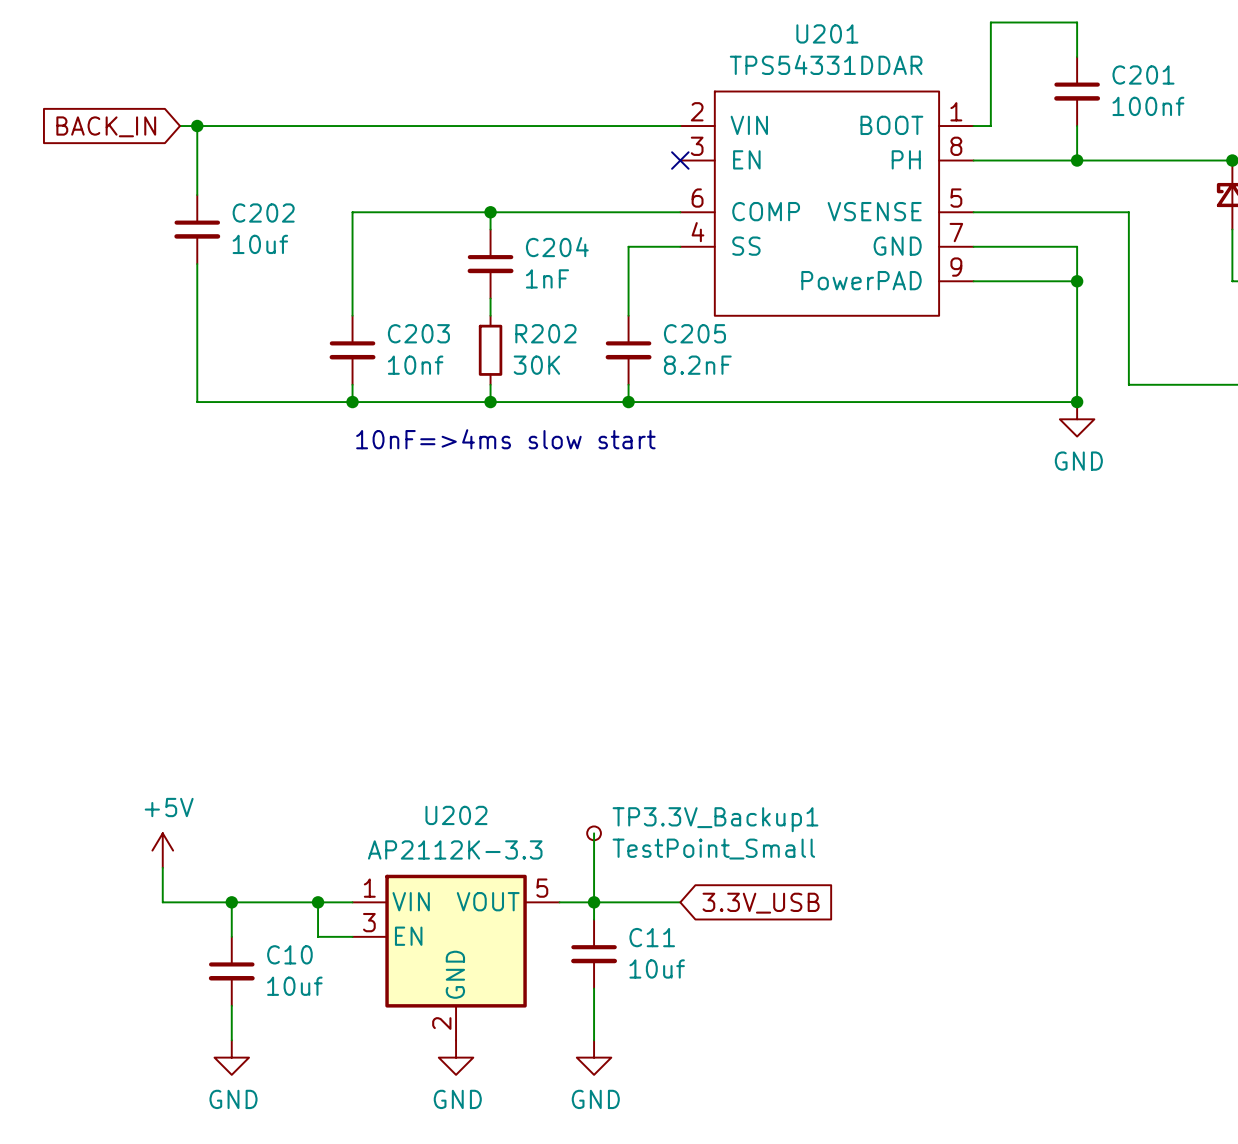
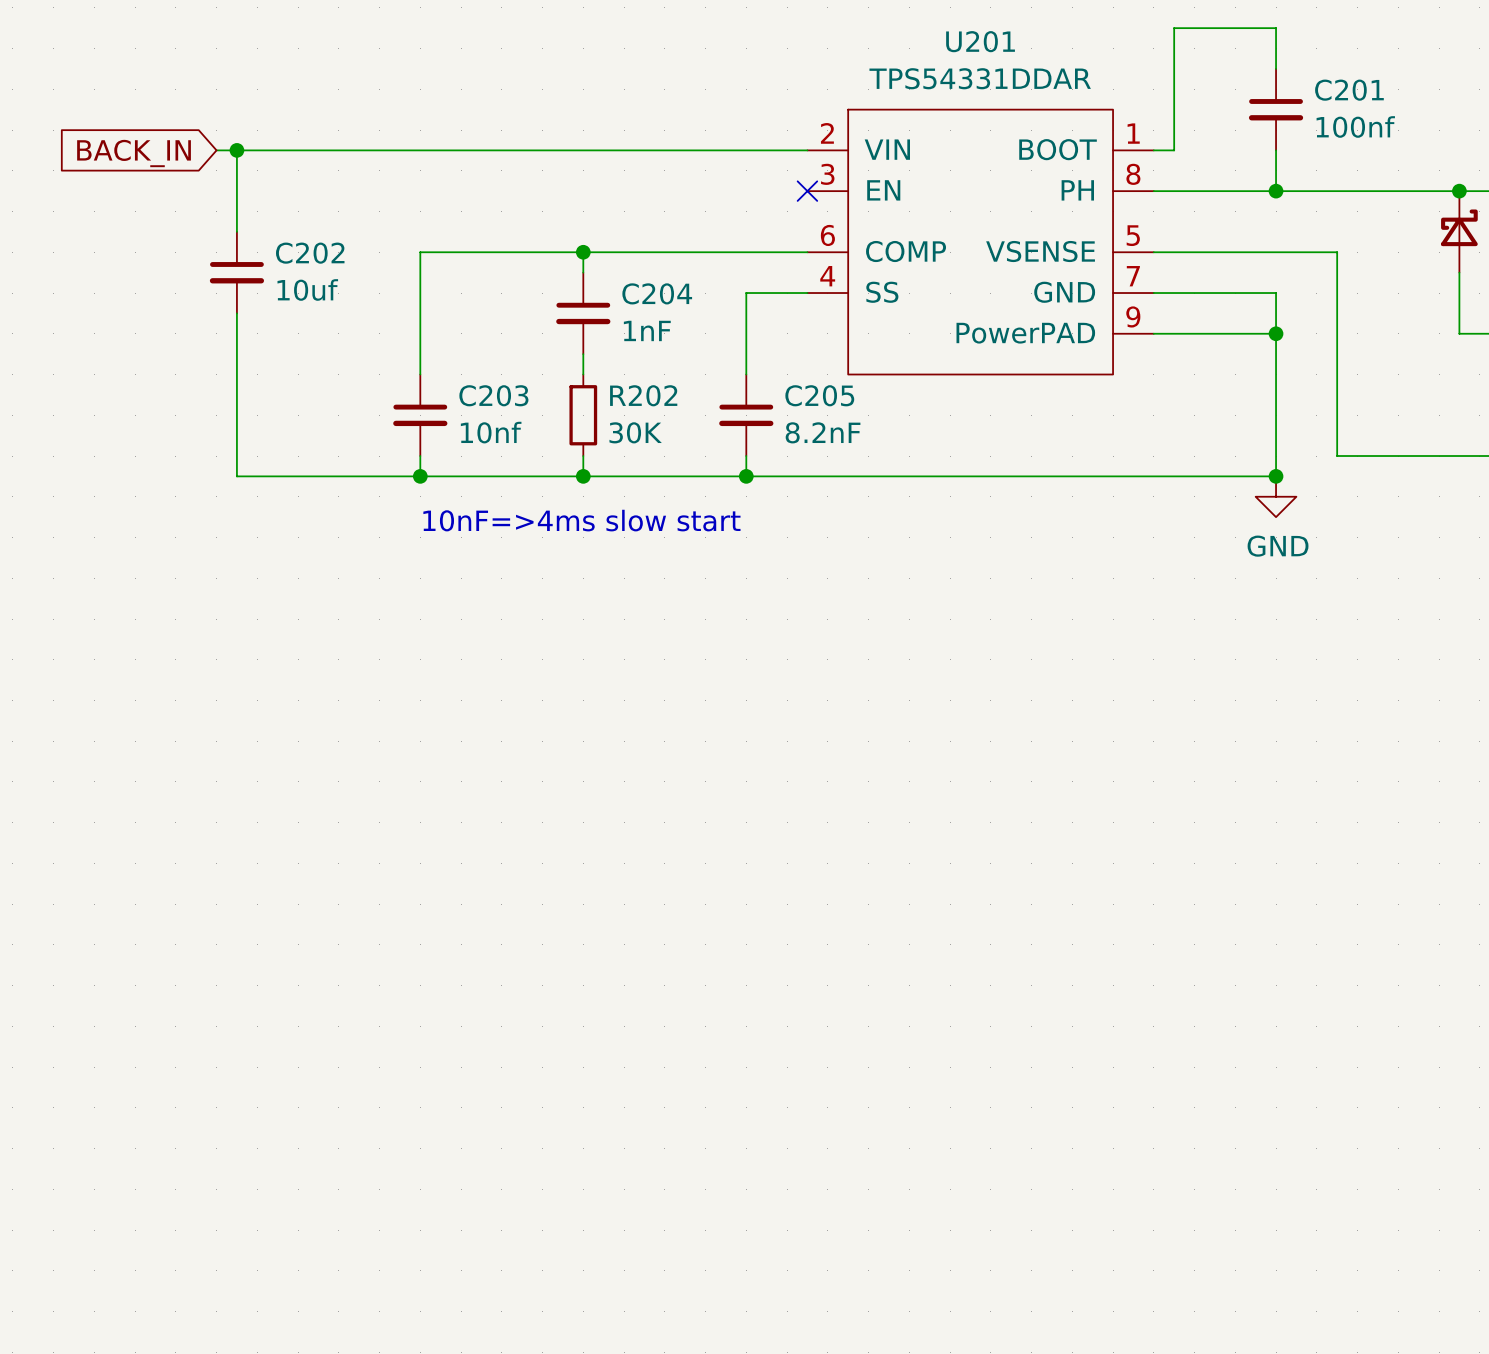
wire: (594, 833) (594, 919) -> none
TP3.3V_Backup1: TestPoint_Small (594, 833) -> none
power symbol: +5V (162, 850) -> none
wire: (162, 867) (162, 902) (352, 902) -> none
wire: (231, 902) (231, 936) -> none
junction: (231, 902) -> none
wire: (318, 902) (318, 936) (352, 936) -> none
junction: (318, 902) -> none
wire: (559, 902) (680, 902) -> none
junction: (594, 902) -> none
global label: 3.3V_USB (761, 903) -> none
C11: 10uf (594, 954) -> none
U202: AP2112K-3.3 (456, 957) -> none
C10: 10uf (231, 971) -> none
wire: (594, 988) (594, 1040) -> none
wire: (231, 1005) (231, 1040) -> none
power symbol: GND (231, 1057) -> none
power symbol: GND (456, 1057) -> none
power symbol: GND (594, 1057) -> none

